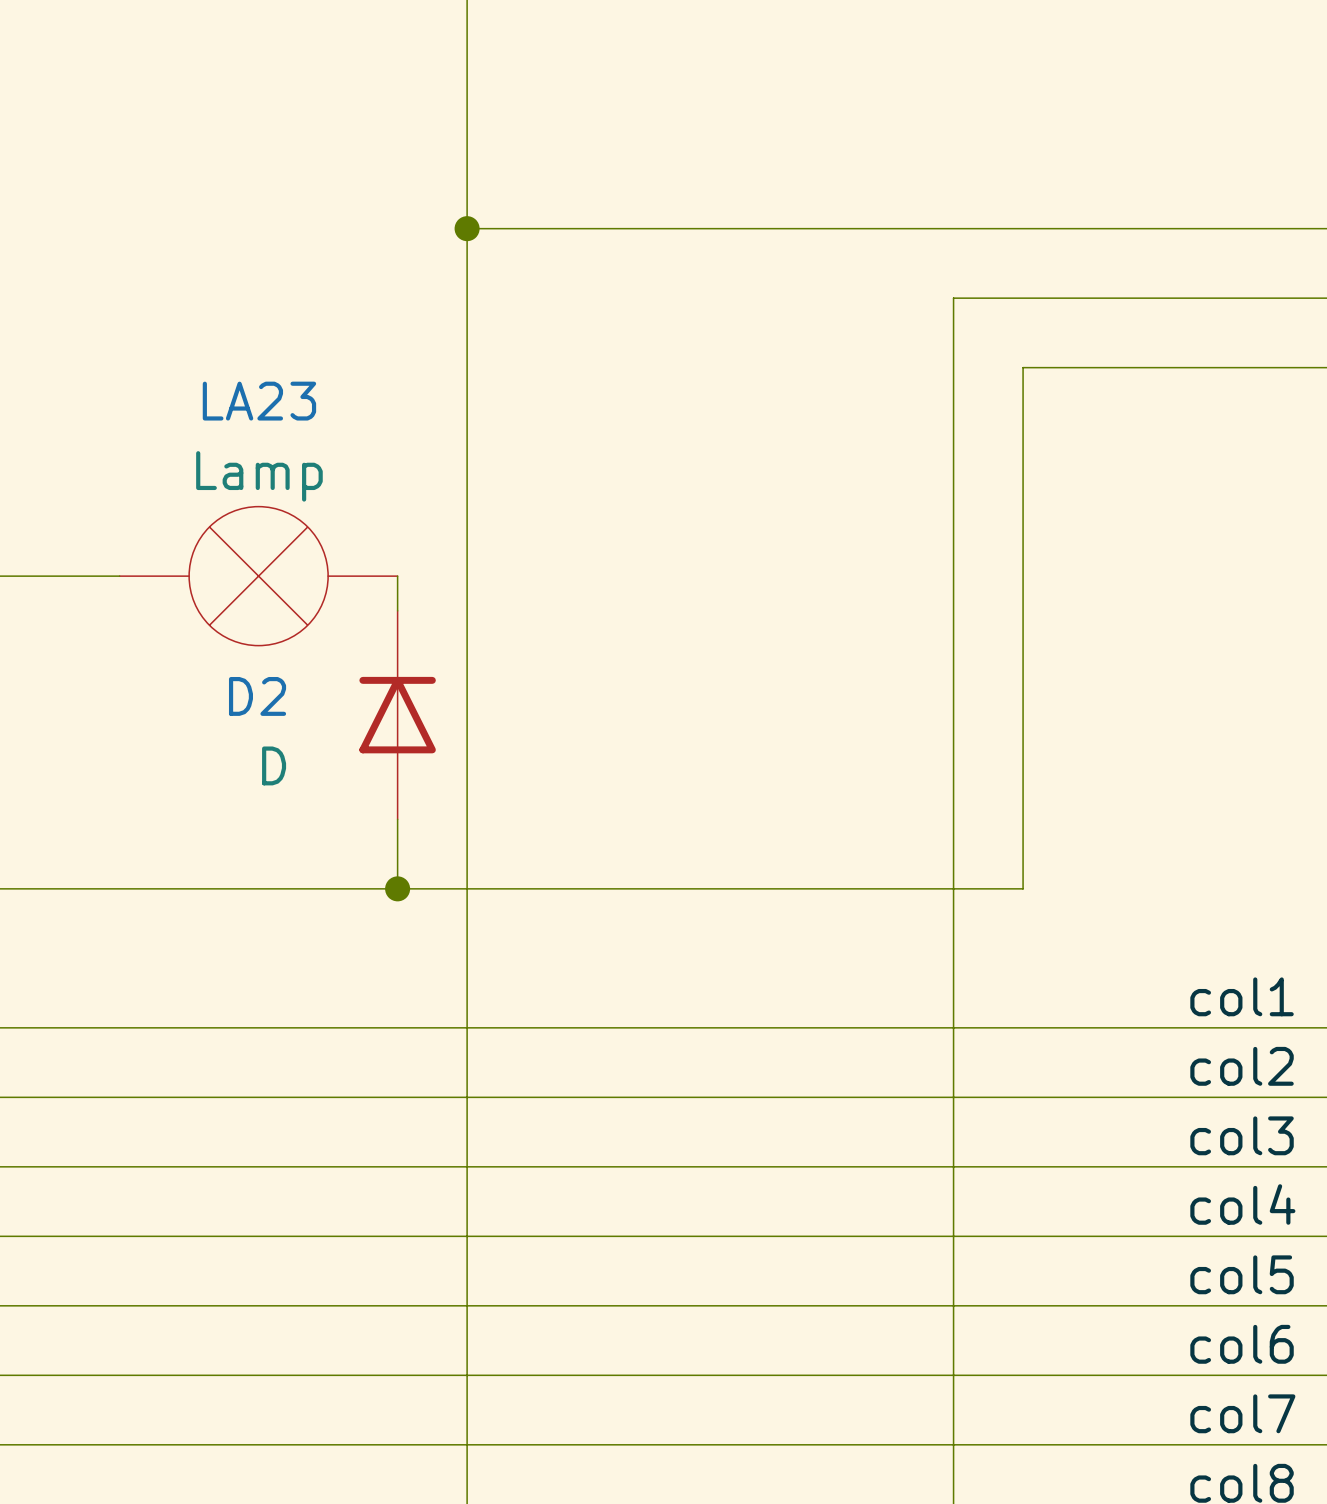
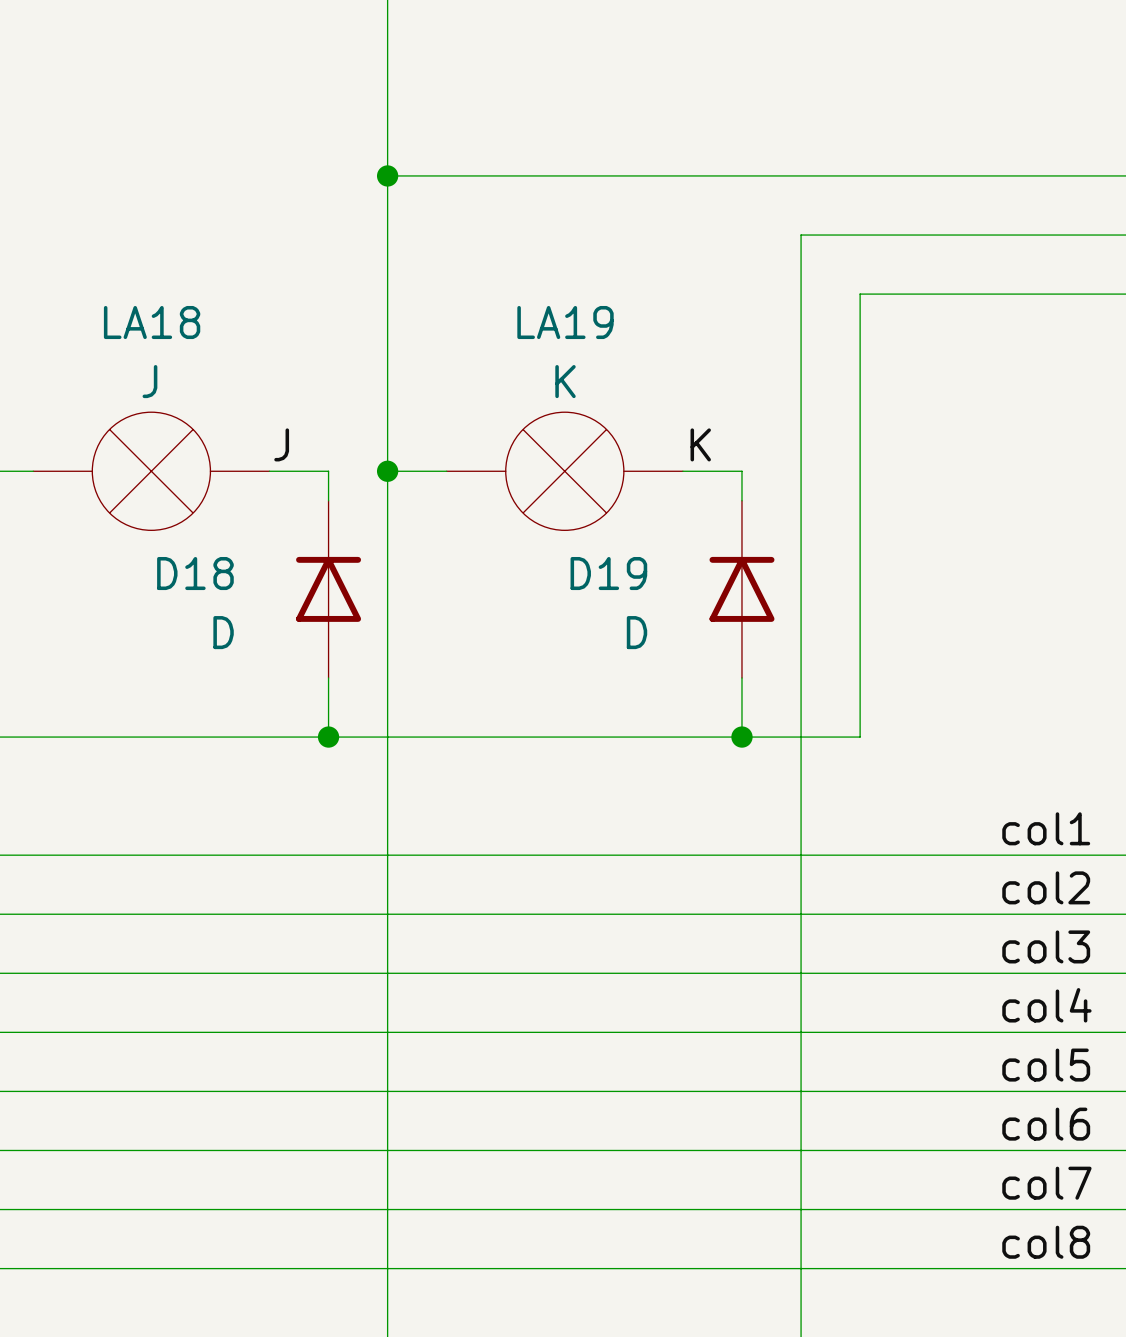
label: none -> J (281, 444)
label: none -> K (700, 444)
LA18: none -> J (151, 471)
LA23: Lamp (258, 576) -> none
wire: none -> (387, 471) (446, 471)
junction: none -> (387, 471)
LA19: none -> K (564, 471)
wire: none -> (682, 471) (741, 471) (741, 500)
D2 name: D2 (257, 696) -> D18 (195, 573)
D19: none -> D (741, 589)
wire: none -> (741, 677) (741, 737)
junction: none -> (741, 737)

